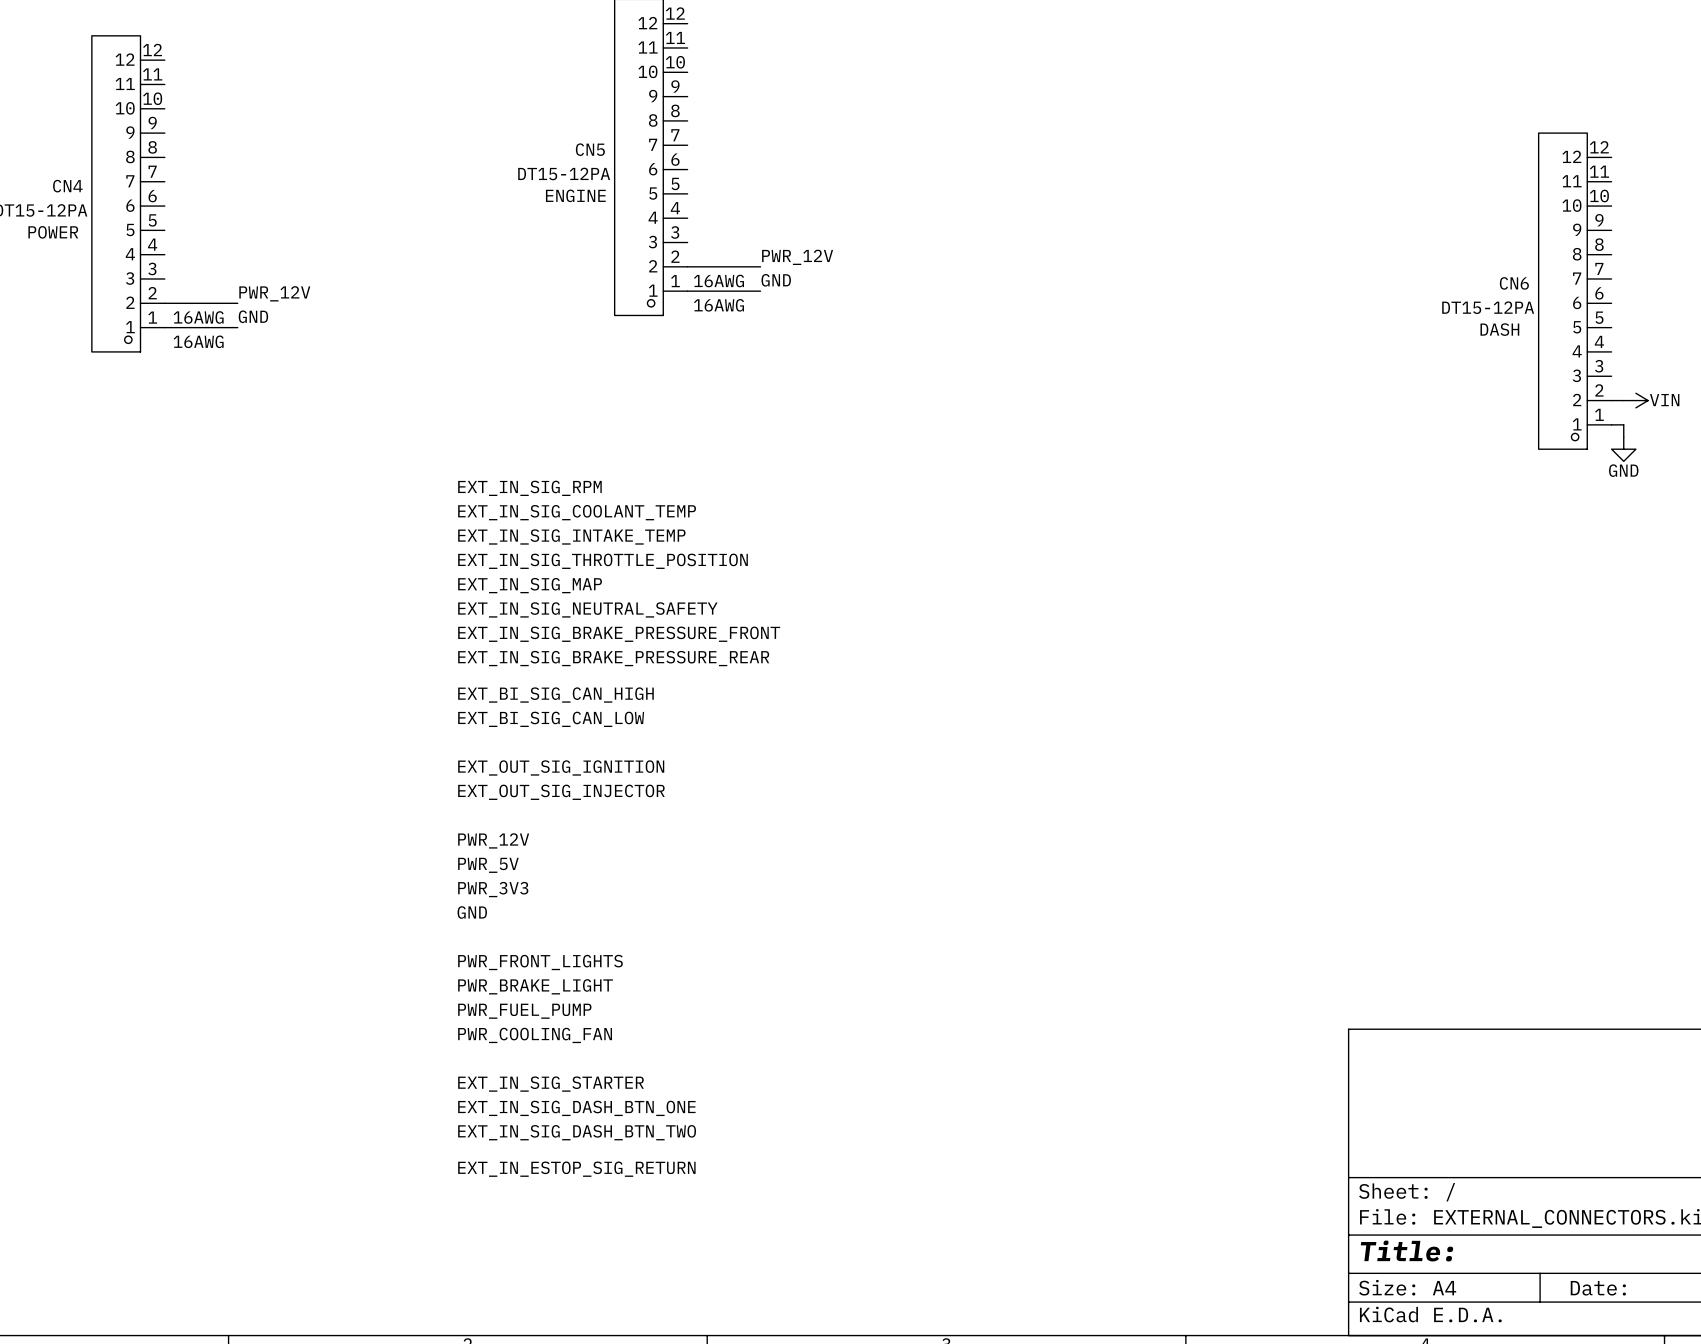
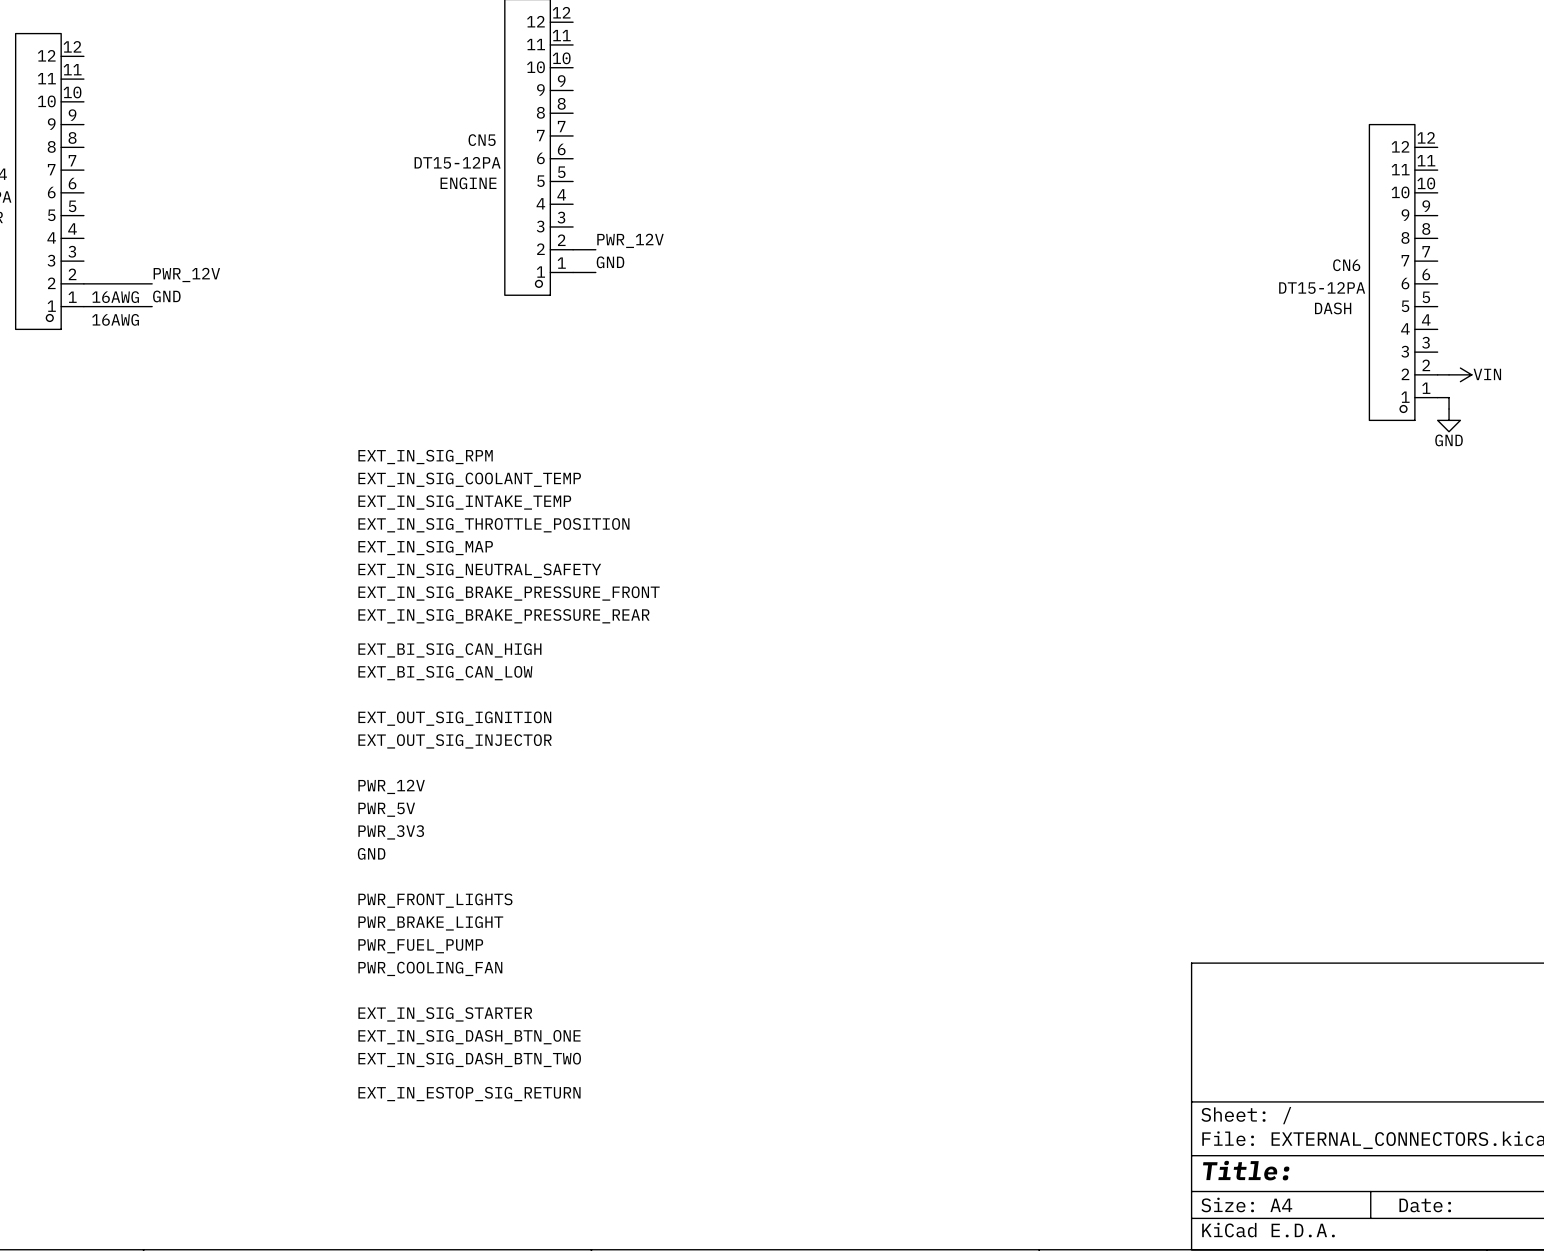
label position: PWR_12V (797, 257) -> PWR_12V (630, 240)
wire: (711, 266) (760, 266) -> none
label position: GND (776, 280) -> GND (610, 262)
text: 16AWG (718, 281) -> none
wire: (711, 291) (760, 291) -> none
text: 16AWG (718, 305) -> none

